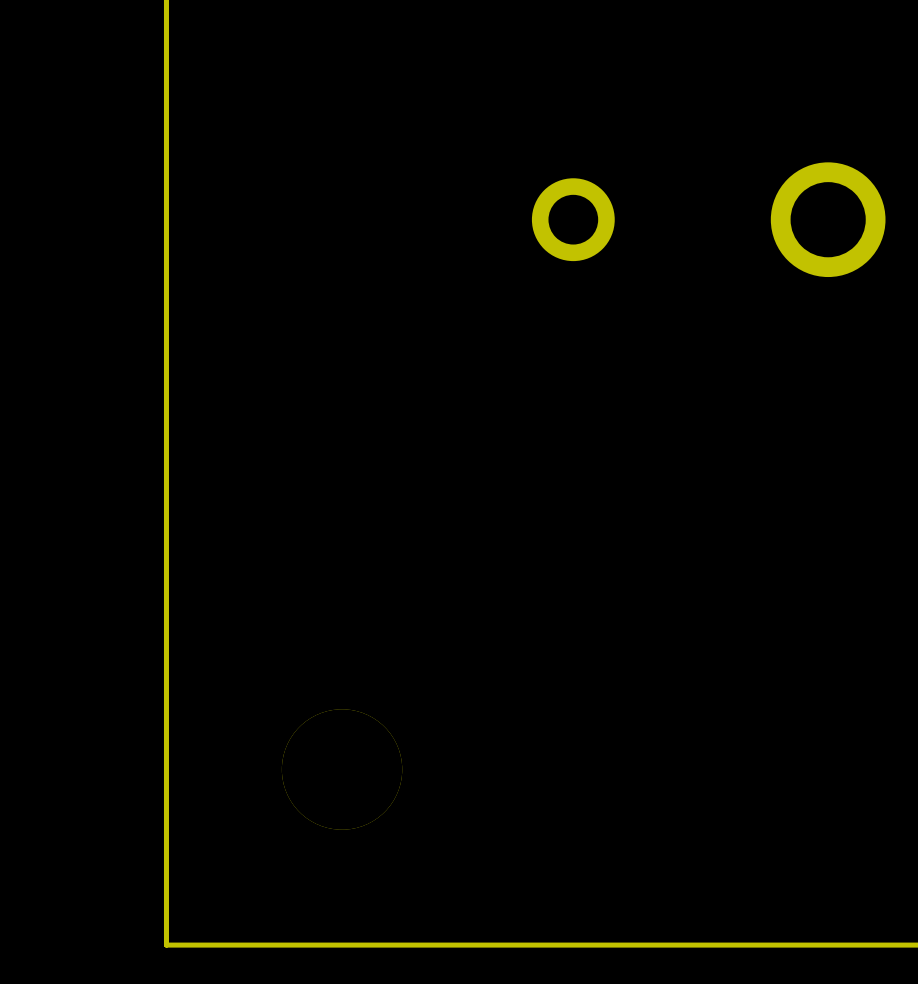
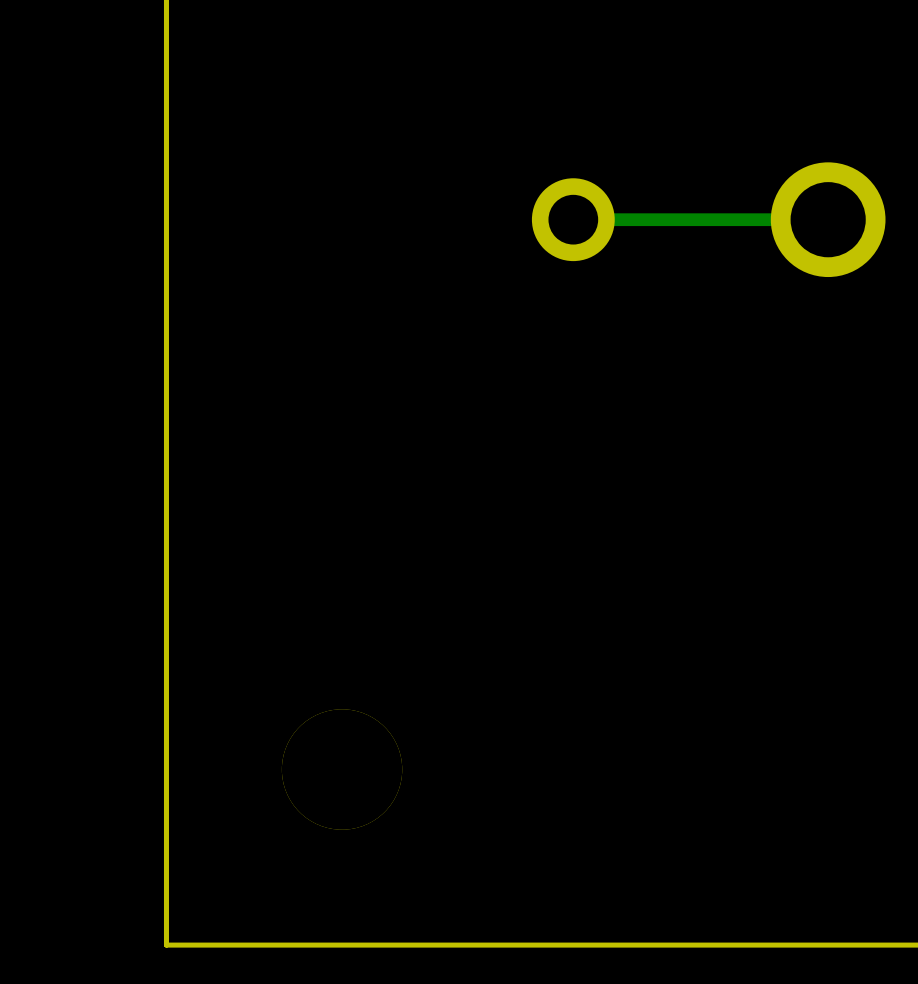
bottom track: none -> (828, 219) (573, 219)

